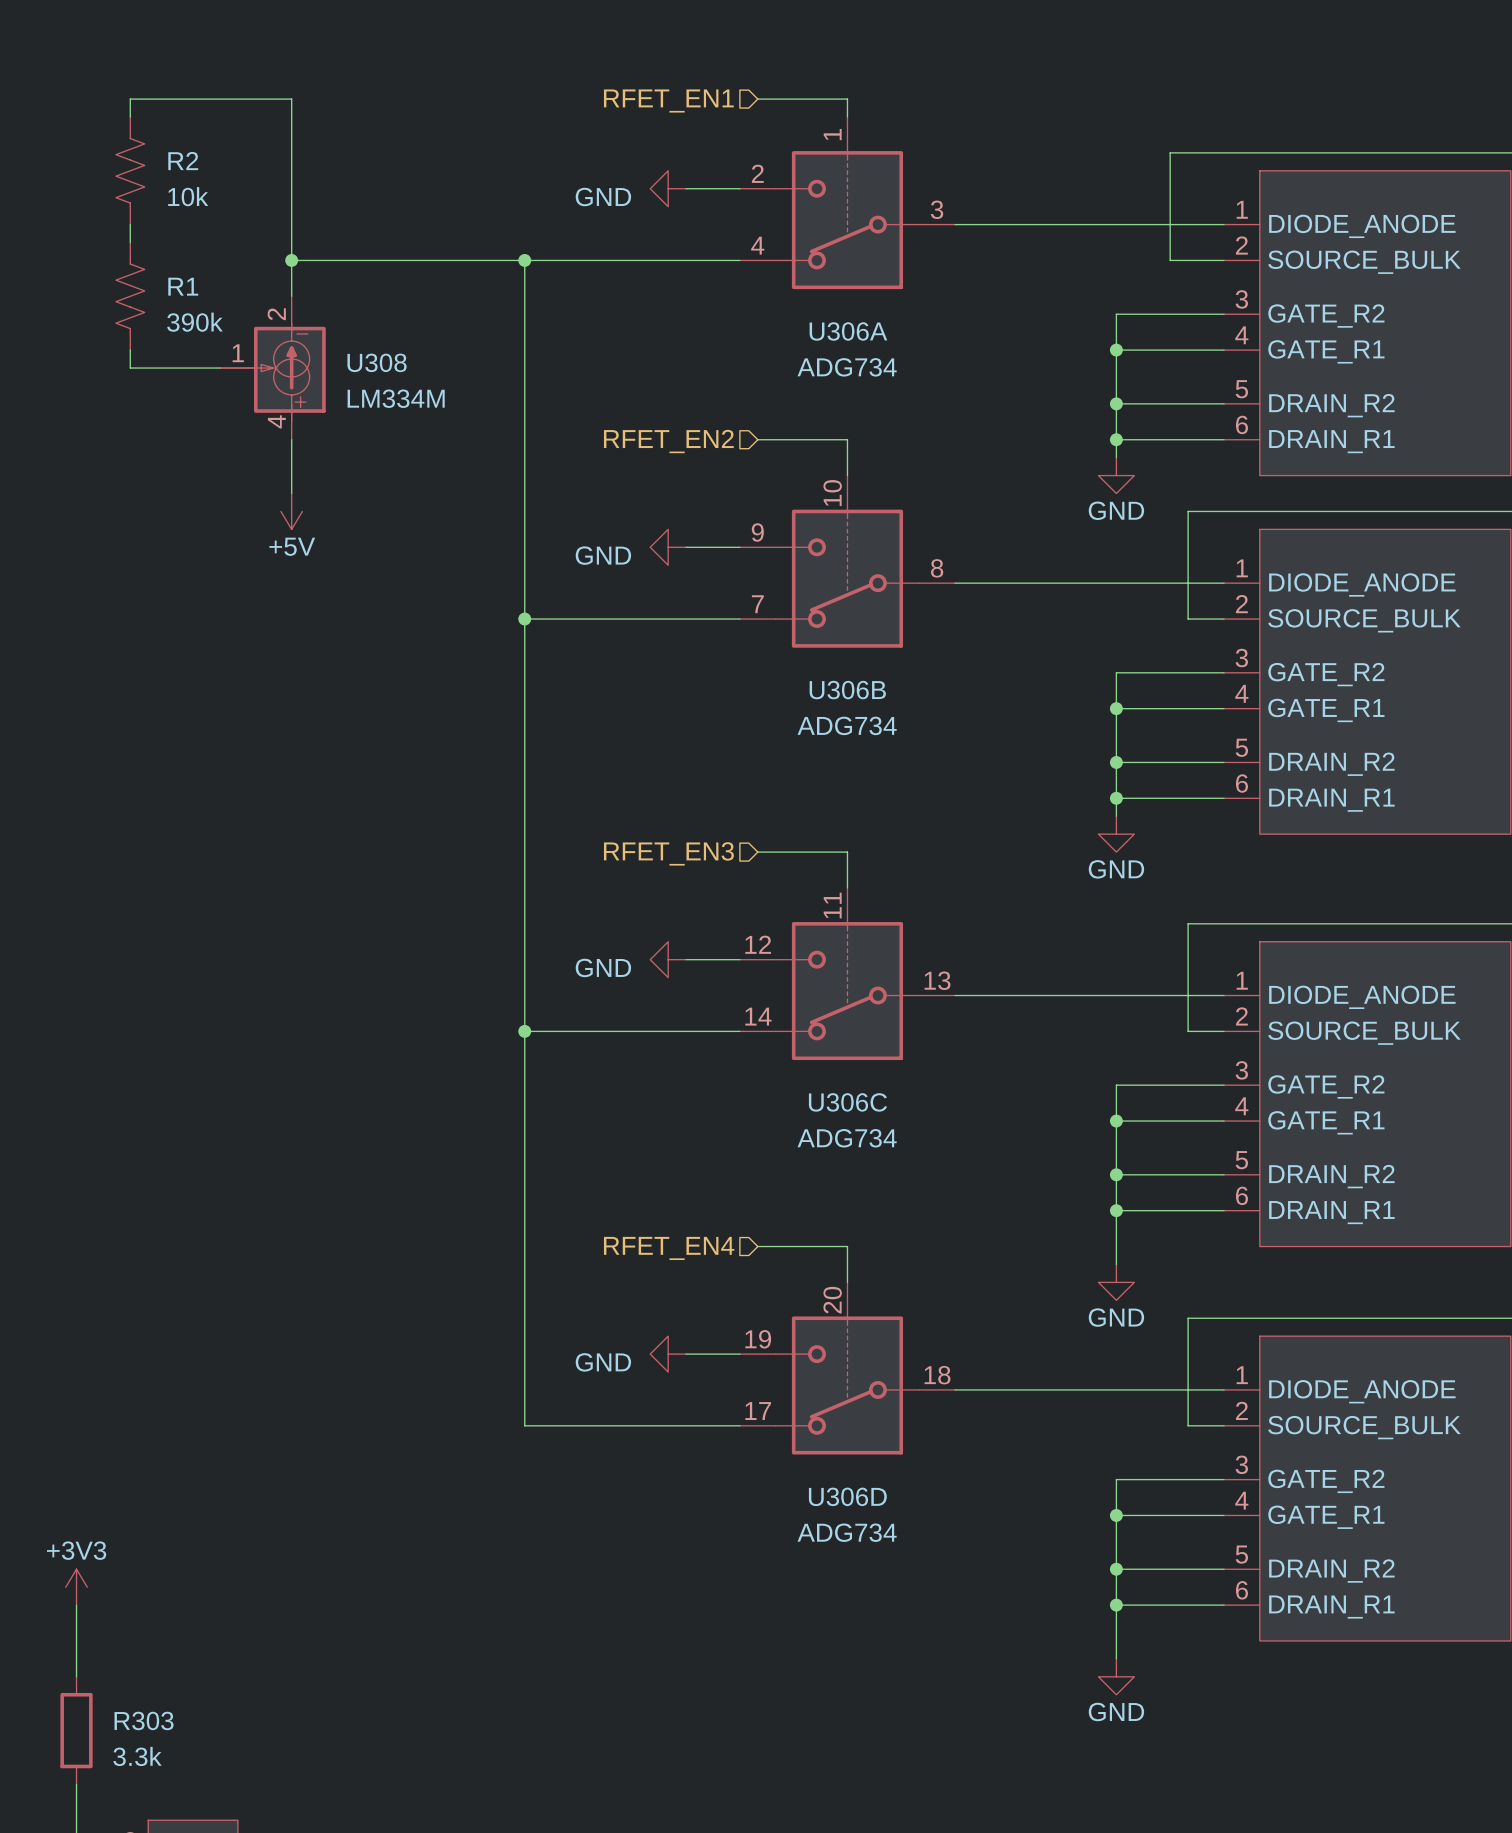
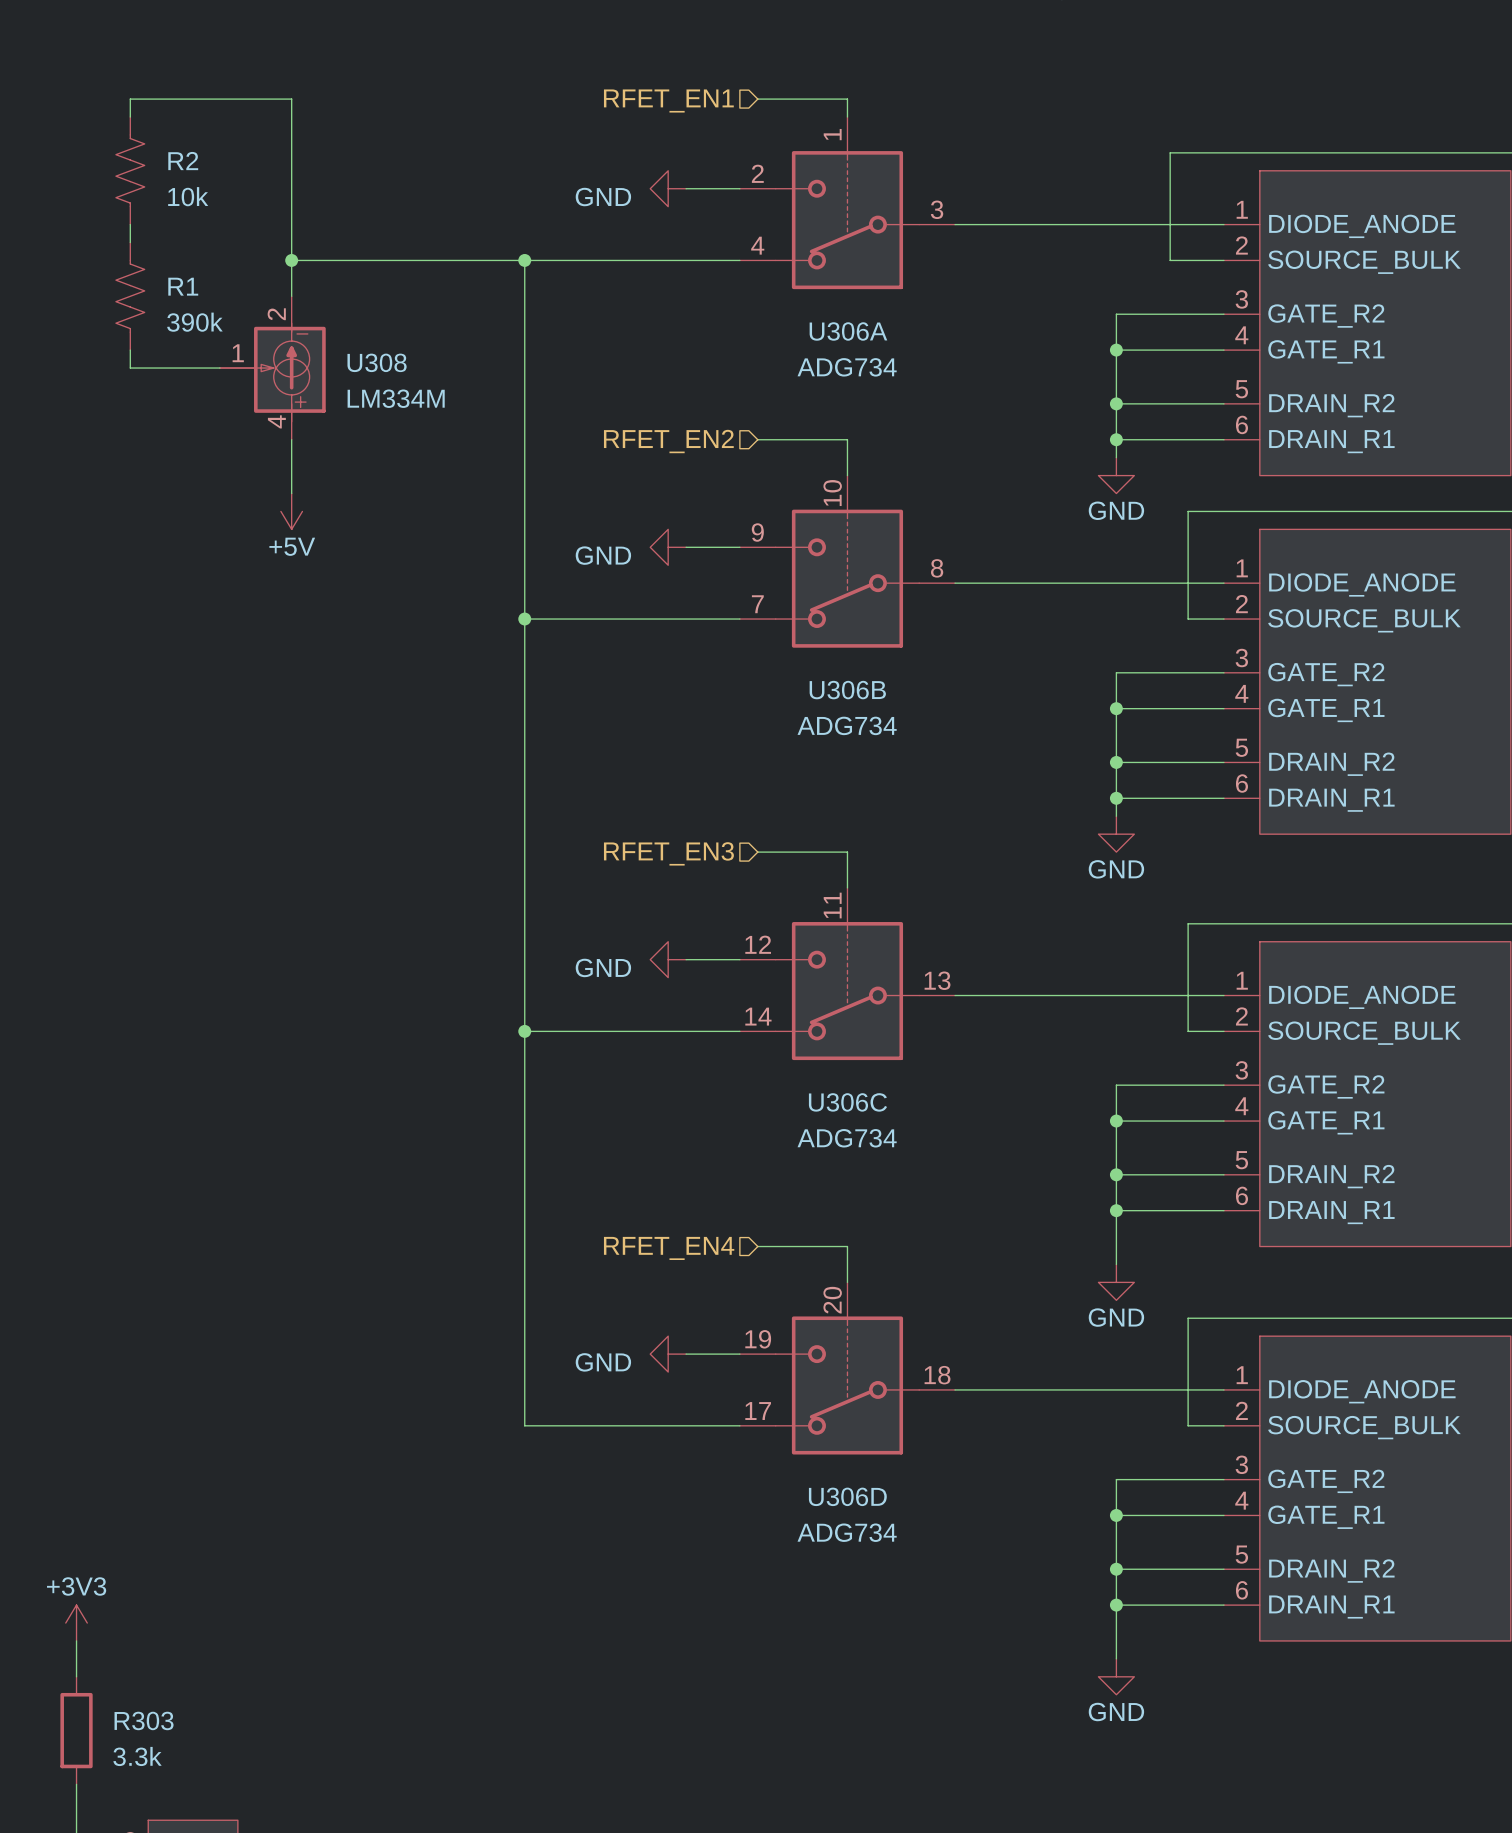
power symbol position: +3V3 (76, 1587) -> +3V3 (76, 1623)

